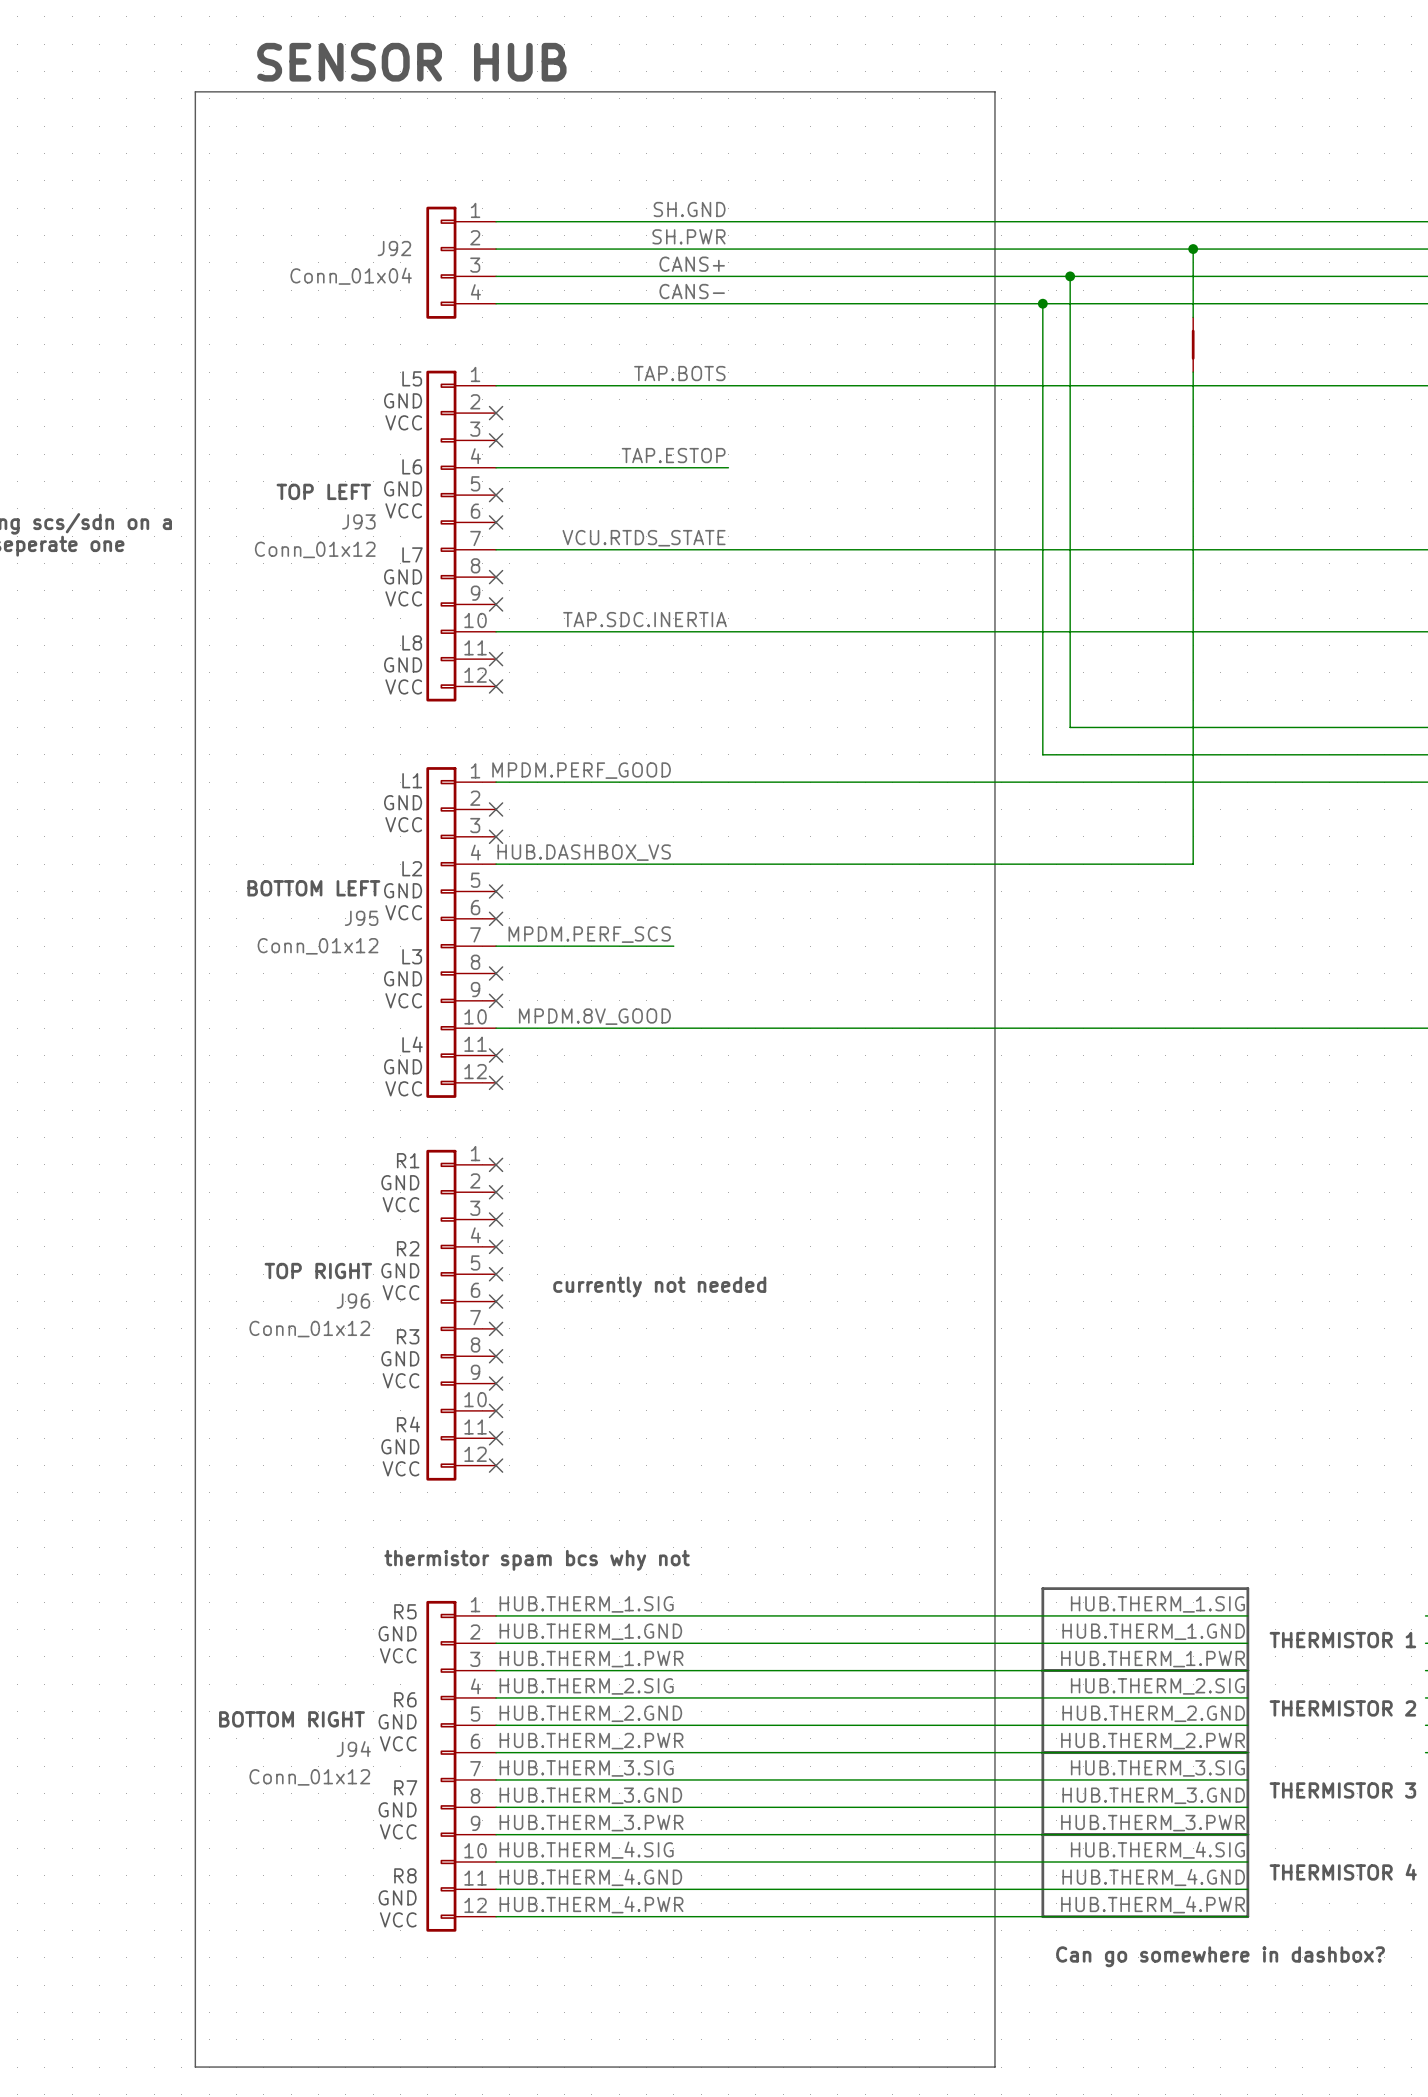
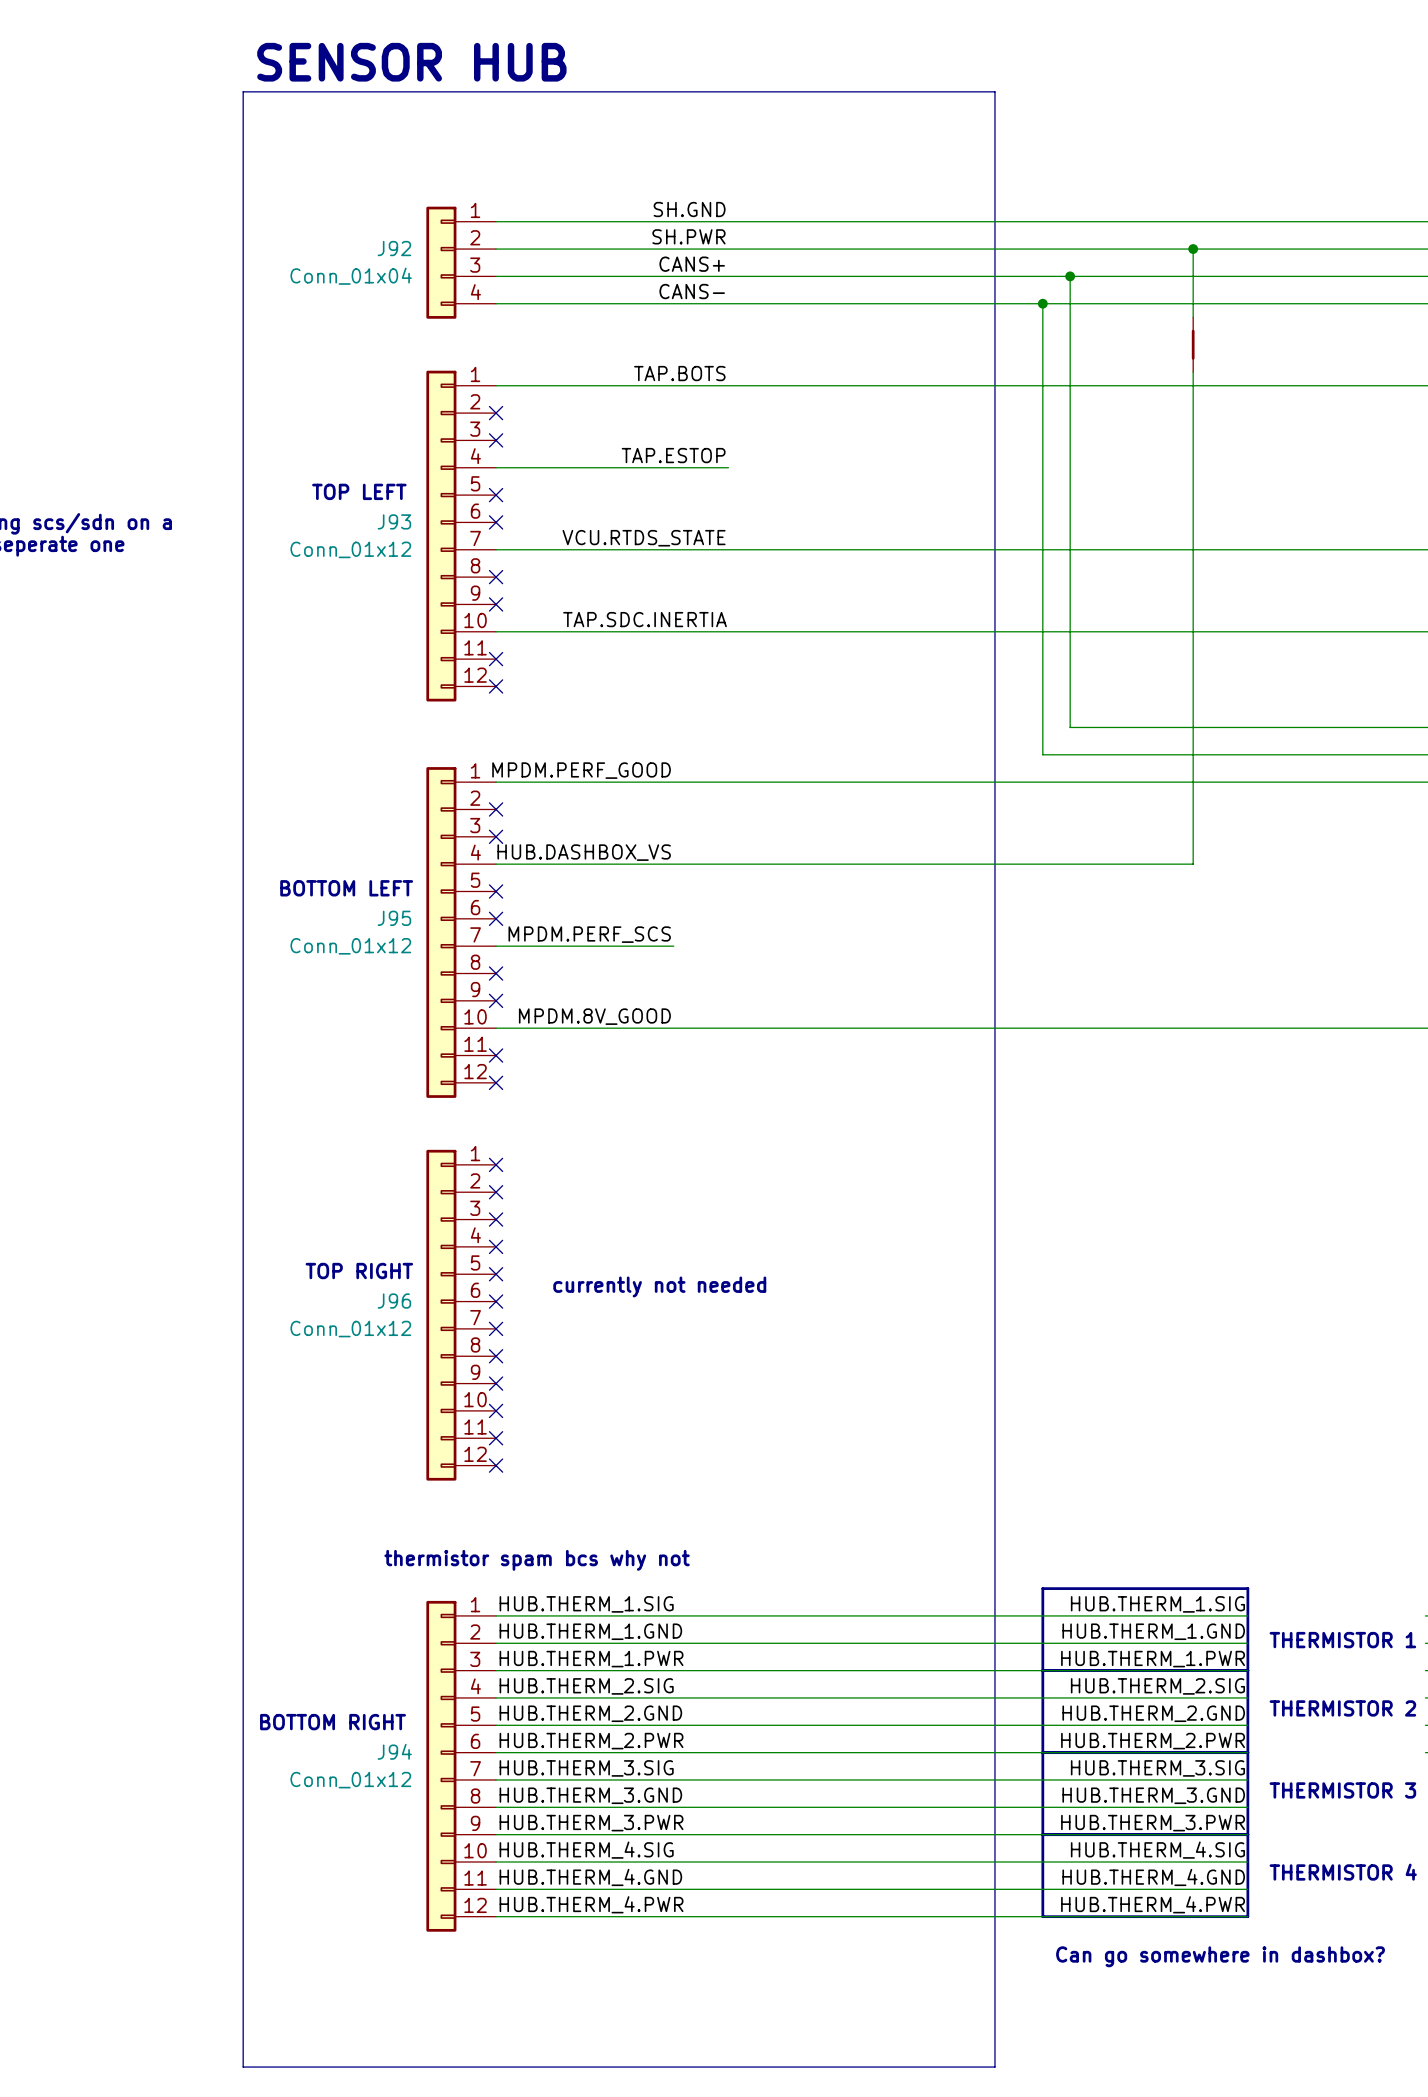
line: (243, 91) (195, 91) (195, 2067) (243, 2067) -> (243, 91) (243, 2067)
text: L5 (412, 378) -> none
text: GND (403, 400) -> none
text: VCC (403, 422) -> none
text: L6 (412, 466) -> none
text: GND (403, 488) -> none
text position: TOP LEFT (323, 491) -> TOP LEFT (359, 491)
text: VCC (403, 510) -> none
J93 name position: J93 (358, 521) -> J93 (394, 521)
J93 value position: Conn_01x12 (315, 549) -> Conn_01x12 (350, 549)
text: L7 (412, 554) -> none
text: GND (403, 576) -> none
text: VCC (403, 598) -> none
text: L8 (412, 642) -> none
text: GND (403, 664) -> none
text: VCC (403, 686) -> none
text: L1 (412, 780) -> none
text: GND (403, 802) -> none
text: VCC (403, 824) -> none
text: L2 (412, 868) -> none
text position: BOTTOM LEFT (313, 888) -> BOTTOM LEFT (346, 888)
text: GND (403, 890) -> none
text: VCC (403, 912) -> none
J95 name position: J95 (361, 918) -> J95 (394, 918)
J95 value position: Conn_01x12 (318, 946) -> Conn_01x12 (350, 946)
text: L3 (412, 956) -> none
text: GND (403, 978) -> none
text: VCC (403, 1000) -> none
text: L4 (412, 1044) -> none
text: GND (403, 1066) -> none
text: VCC (403, 1088) -> none
text: R1 (408, 1160) -> none
text: GND (400, 1182) -> none
text: VCC (400, 1204) -> none
text: R2 (408, 1248) -> none
text: GND (400, 1270) -> none
text position: TOP RIGHT (318, 1271) -> TOP RIGHT (359, 1271)
text: VCC (400, 1292) -> none
J96 name position: J96 (353, 1301) -> J96 (394, 1301)
J96 value position: Conn_01x12 (309, 1329) -> Conn_01x12 (350, 1329)
text: R3 (408, 1336) -> none
text: GND (400, 1358) -> none
text: VCC (400, 1380) -> none
text: R4 (408, 1424) -> none
text: GND (400, 1446) -> none
text: VCC (400, 1468) -> none
text: R5 (405, 1611) -> none
text: GND (397, 1633) -> none
text: VCC (398, 1655) -> none
text: R6 (405, 1699) -> none
text position: BOTTOM RIGHT (292, 1719) -> BOTTOM RIGHT (333, 1722)
text: GND (397, 1721) -> none
text: VCC (398, 1743) -> none
J94 name position: J94 (353, 1749) -> J94 (394, 1751)
J94 value position: Conn_01x12 (309, 1777) -> Conn_01x12 (350, 1780)
text: R7 (405, 1787) -> none
text: GND (397, 1809) -> none
text: VCC (398, 1831) -> none
text: R8 (405, 1875) -> none
text: GND (397, 1897) -> none
text: VCC (398, 1919) -> none

